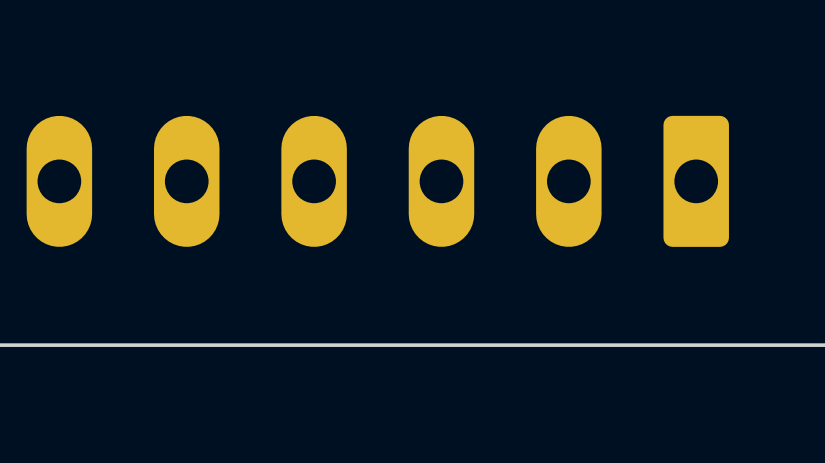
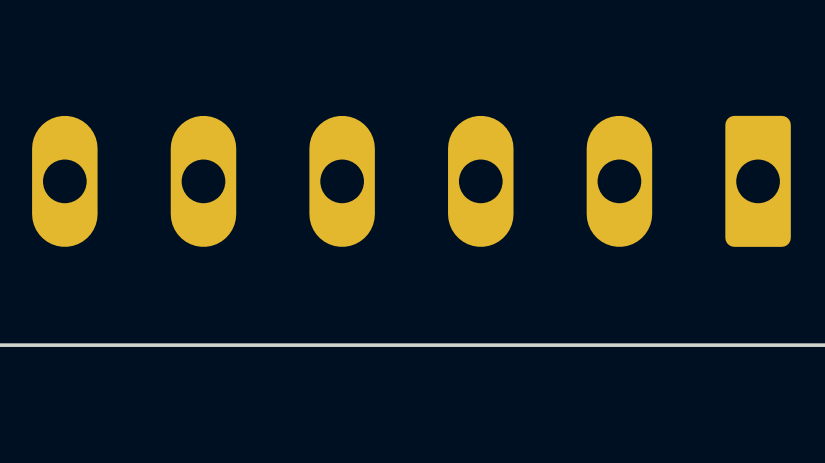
part footprint: [26, 115, 729, 247] -> [32, 115, 791, 247]

